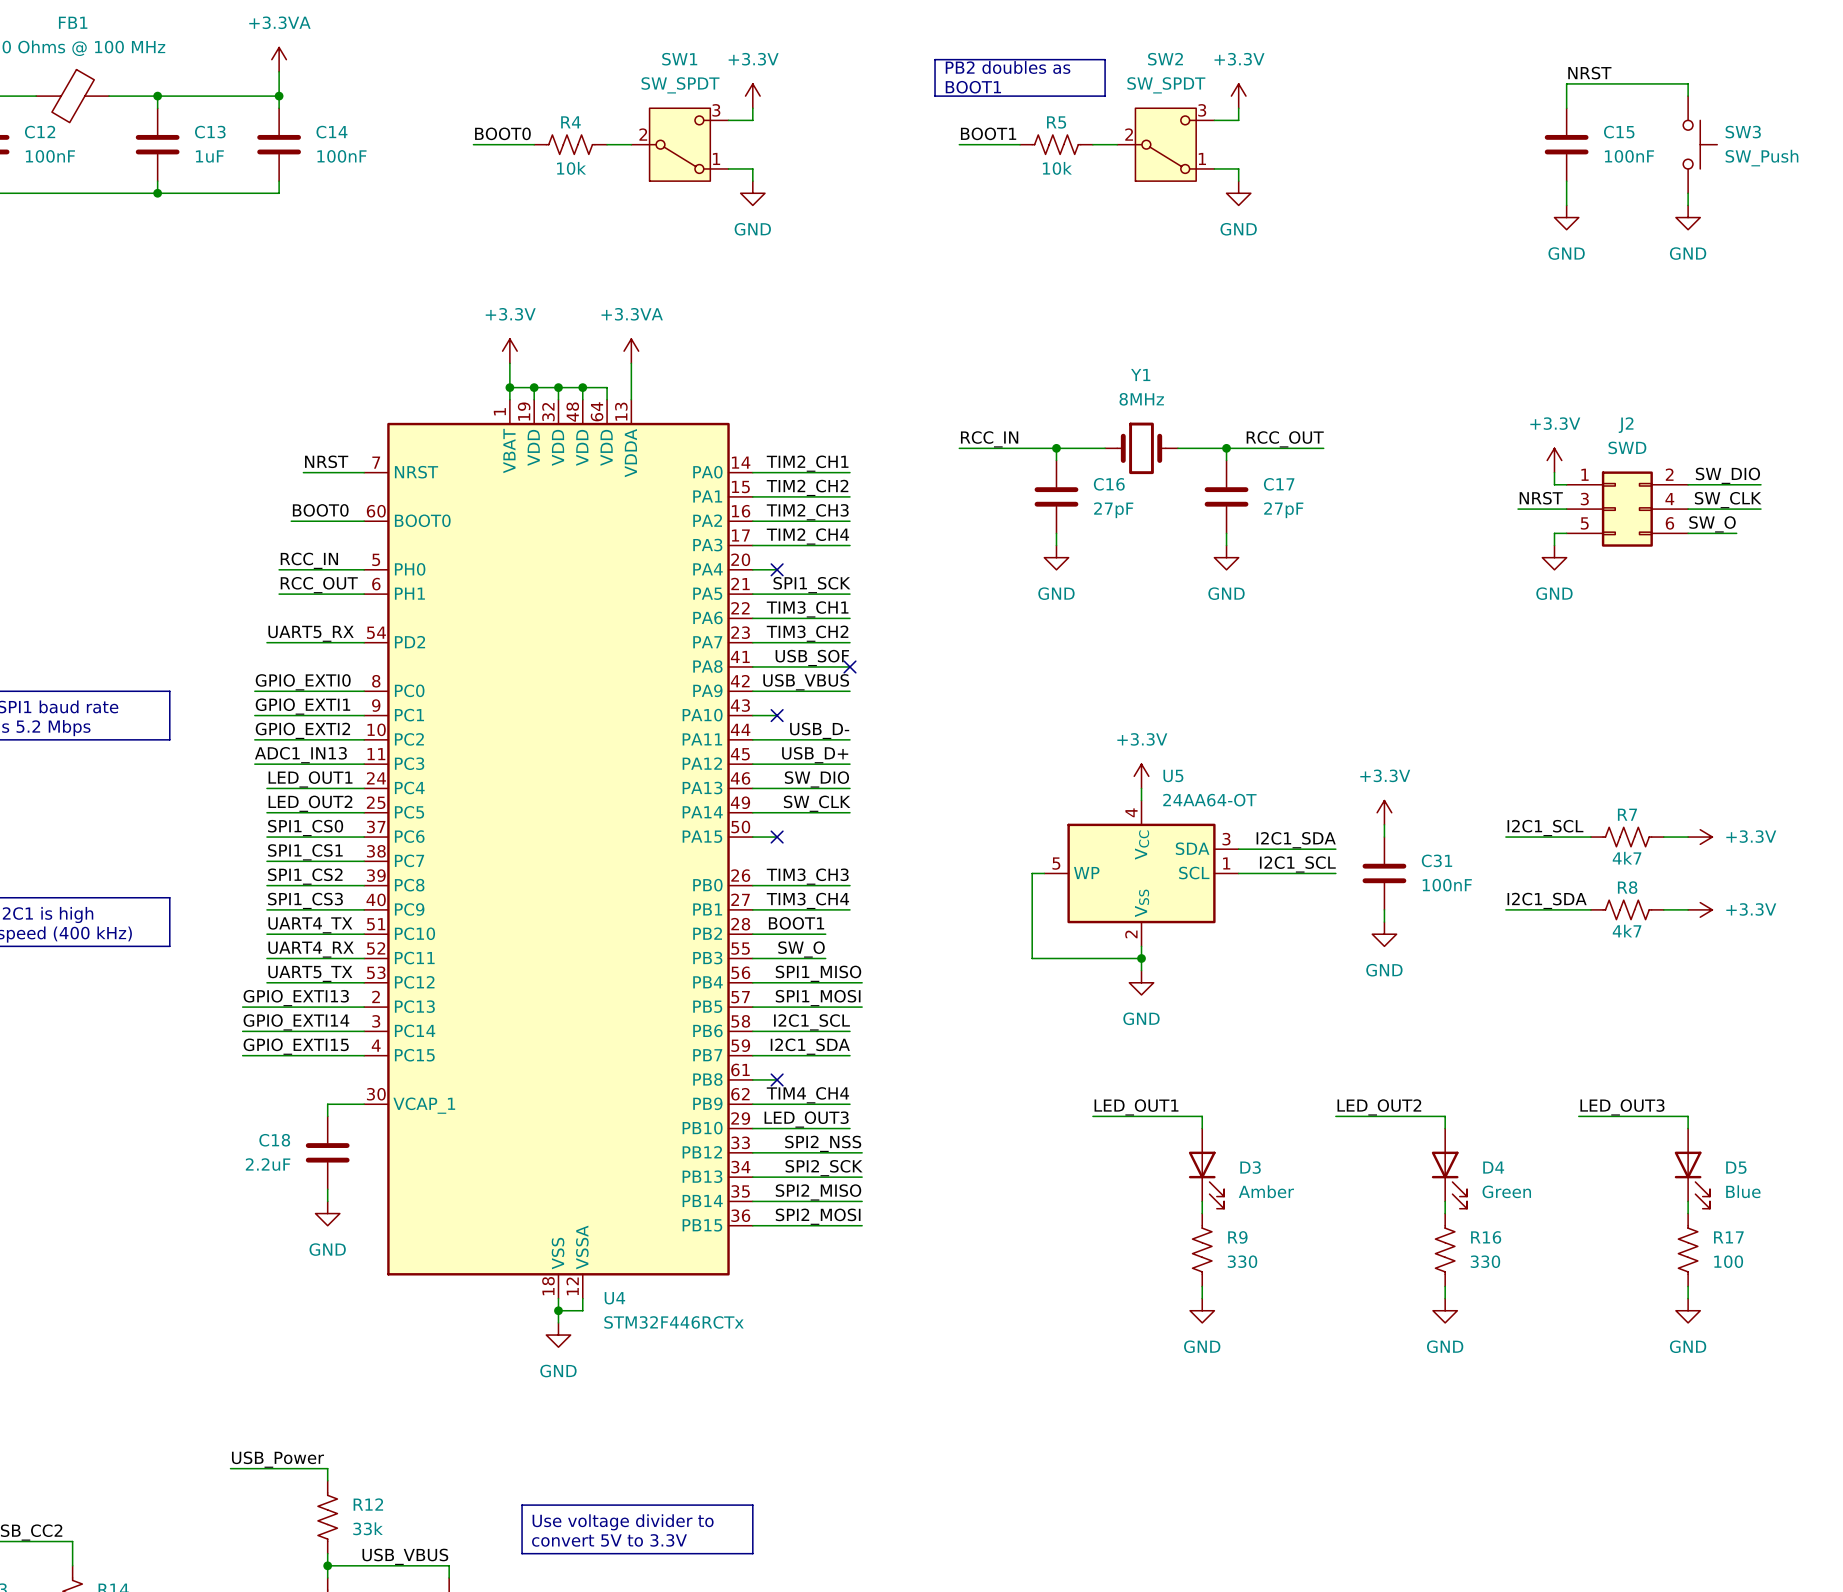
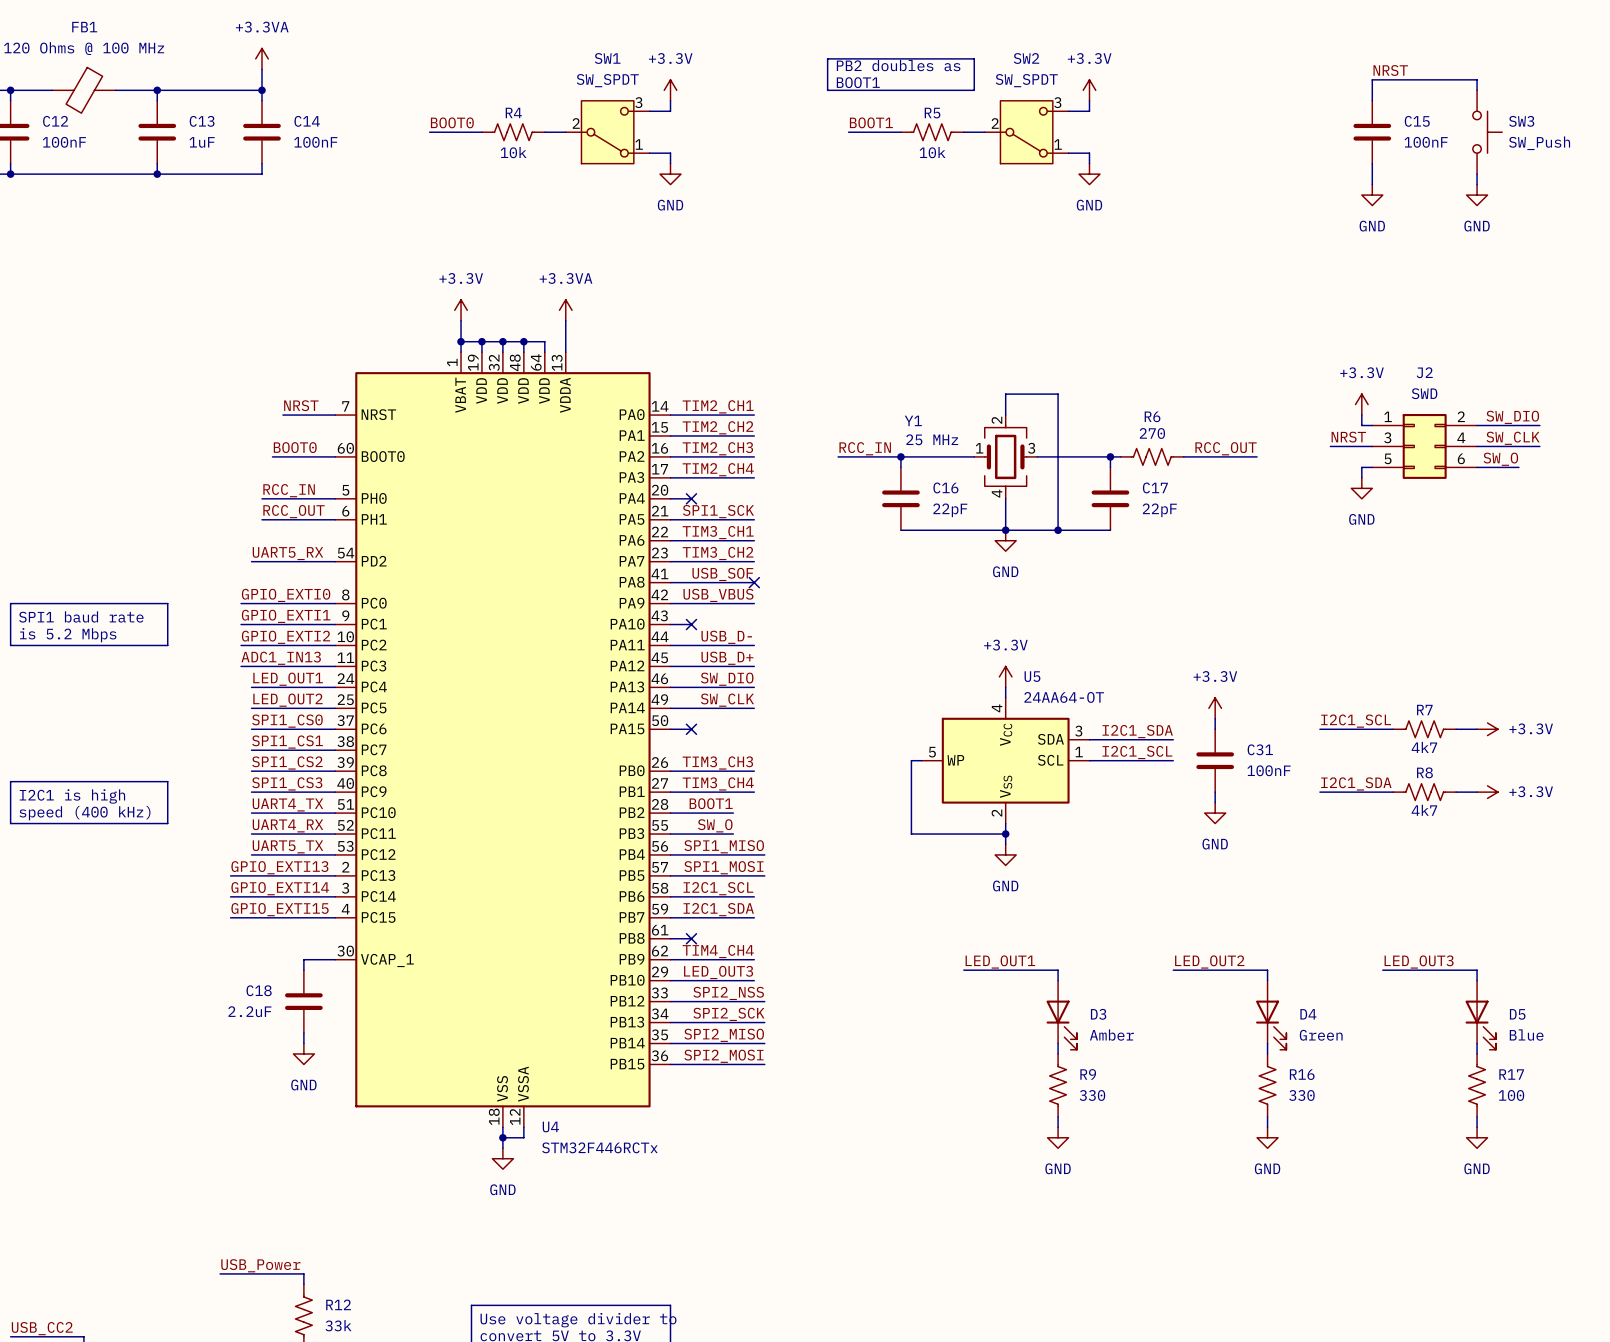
Y1 name position: Y1 (1140, 375) -> Y1 (913, 420)
Y1 value: 8MHz (1141, 399) -> 25 MHz (932, 439)
Y1 symbol: [1105, 422, 1178, 475] -> [974, 415, 1038, 499]
label position: RCC_IN (989, 439) -> RCC_IN (865, 448)
label position: RCC_OUT (1285, 439) -> RCC_OUT (1226, 448)
wire: (959, 448) (1105, 448) -> none
wire: (1056, 448) (1056, 460) -> none
junction: (1056, 448) -> none
wire: none -> (1037, 394) (1005, 394) (1005, 415)
wire: (1202, 448) (1323, 448) -> (1058, 394) (1058, 530)
wire: (1226, 448) (1226, 460) -> none
junction: (1226, 448) -> none
C16 position: (1056, 496) -> (900, 498)
C17 position: (1226, 496) -> (1110, 498)
C16 value: 27pF (1113, 510) -> 22pF (950, 510)
C17 value: 27pF (1283, 510) -> 22pF (1159, 510)
wire: none -> (838, 456) (974, 456)
junction: none -> (900, 456)
wire: none -> (1037, 456) (1120, 456)
junction: none -> (1110, 456)
R6: none -> 270 (1152, 456)
wire: none -> (1183, 456) (1257, 456)
wire: (1056, 533) (1056, 545) -> (900, 456) (900, 467)
wire: (1226, 533) (1226, 545) -> (1110, 456) (1110, 467)
power symbol: GND (1056, 557) -> none
power symbol: GND (1226, 557) -> none
wire: none -> (1005, 498) (1005, 530)
wire: none -> (900, 530) (1110, 530)
junction: none -> (1005, 530)
junction: none -> (1058, 530)
power symbol: none -> GND (1005, 540)

